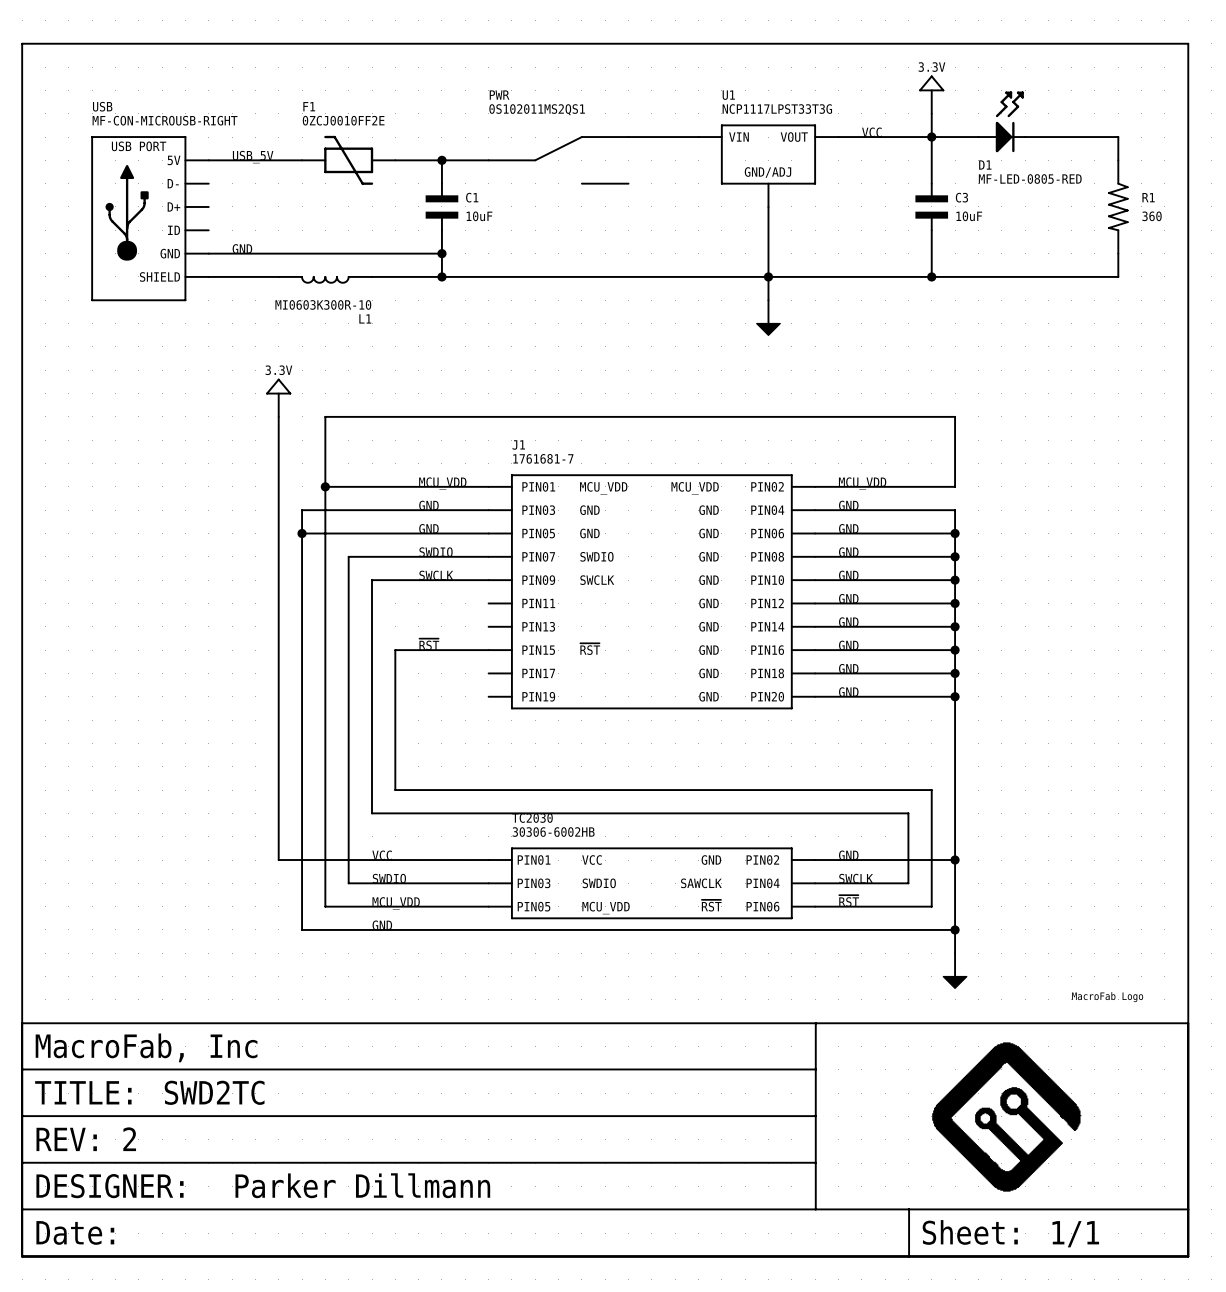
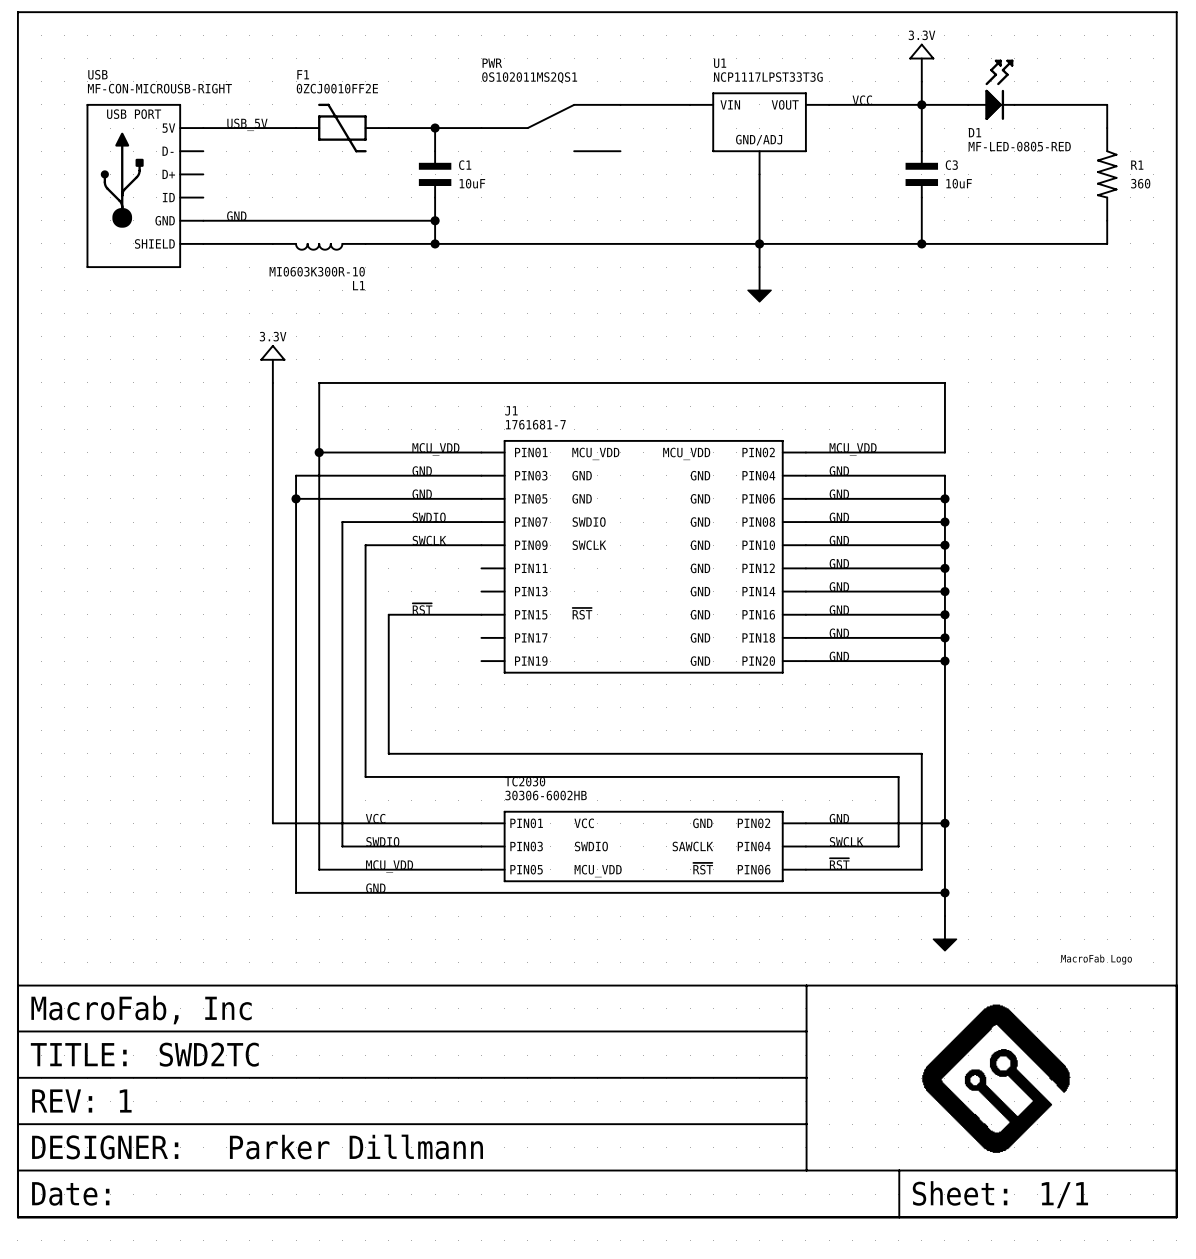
part text: REV: 2 (86, 1139) -> REV: 1 (81, 1101)

